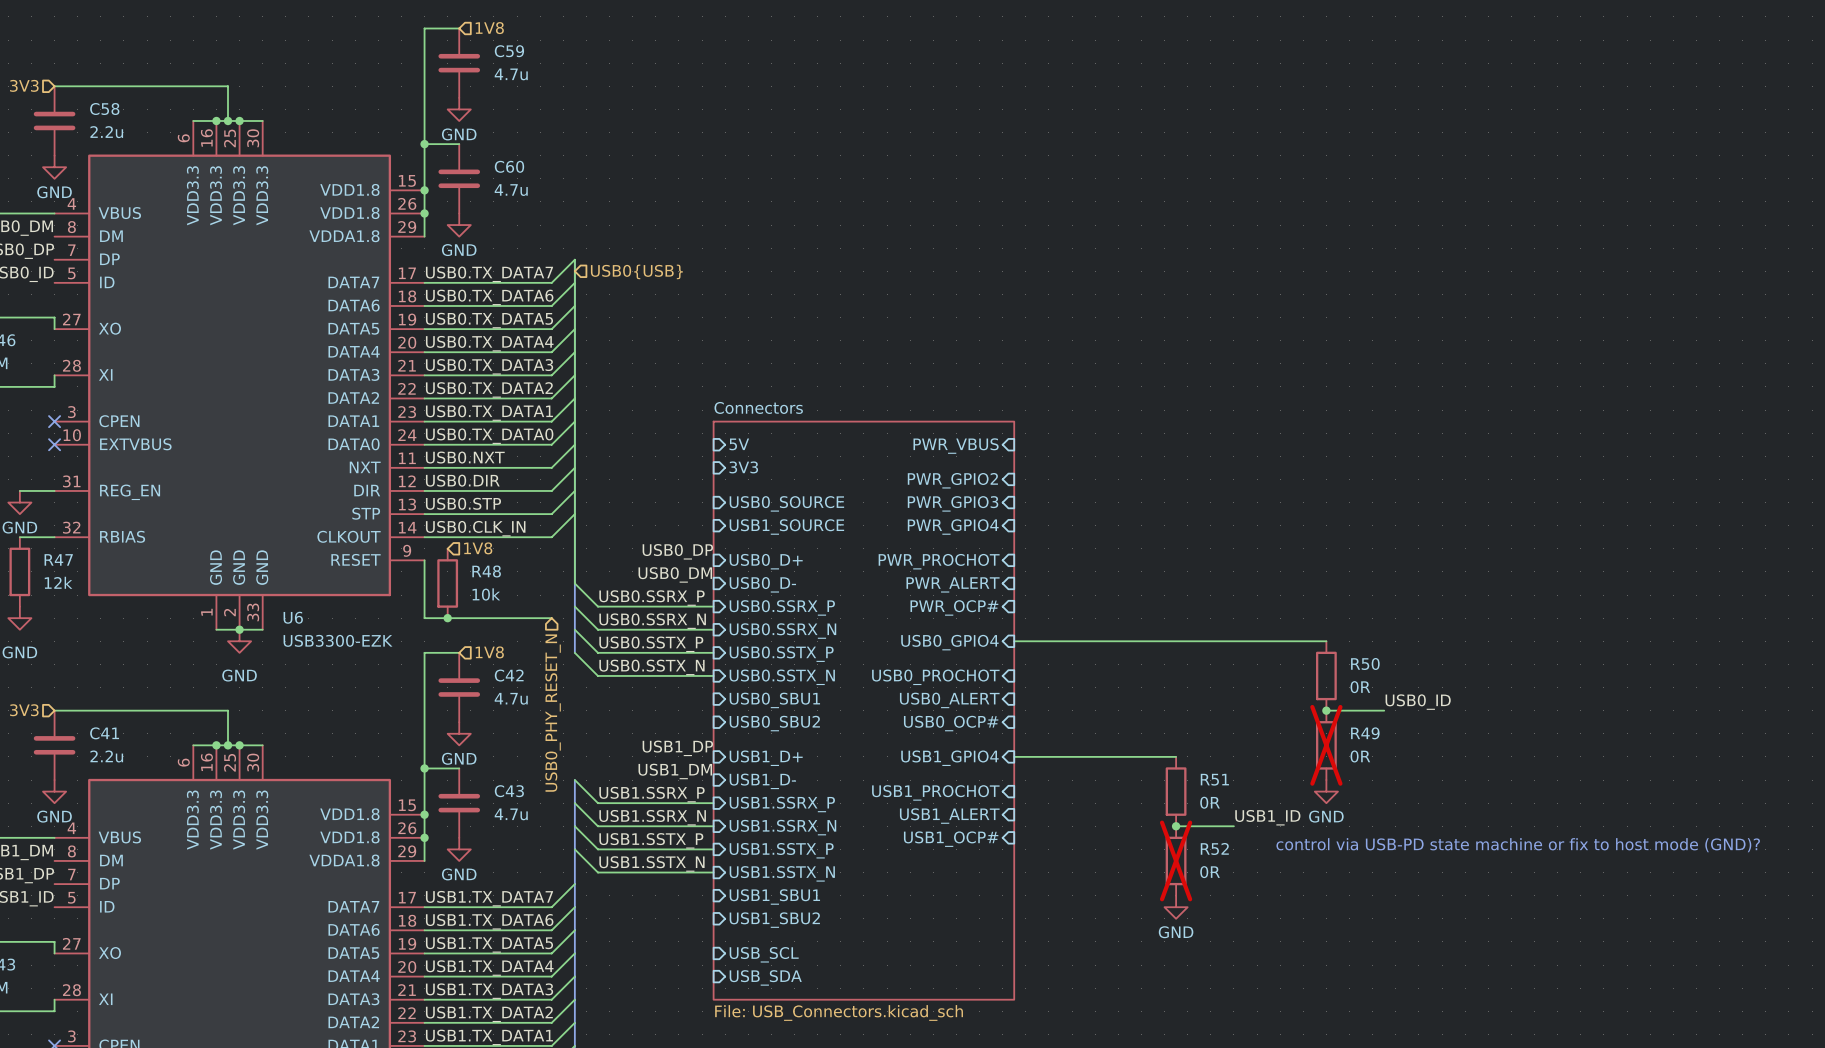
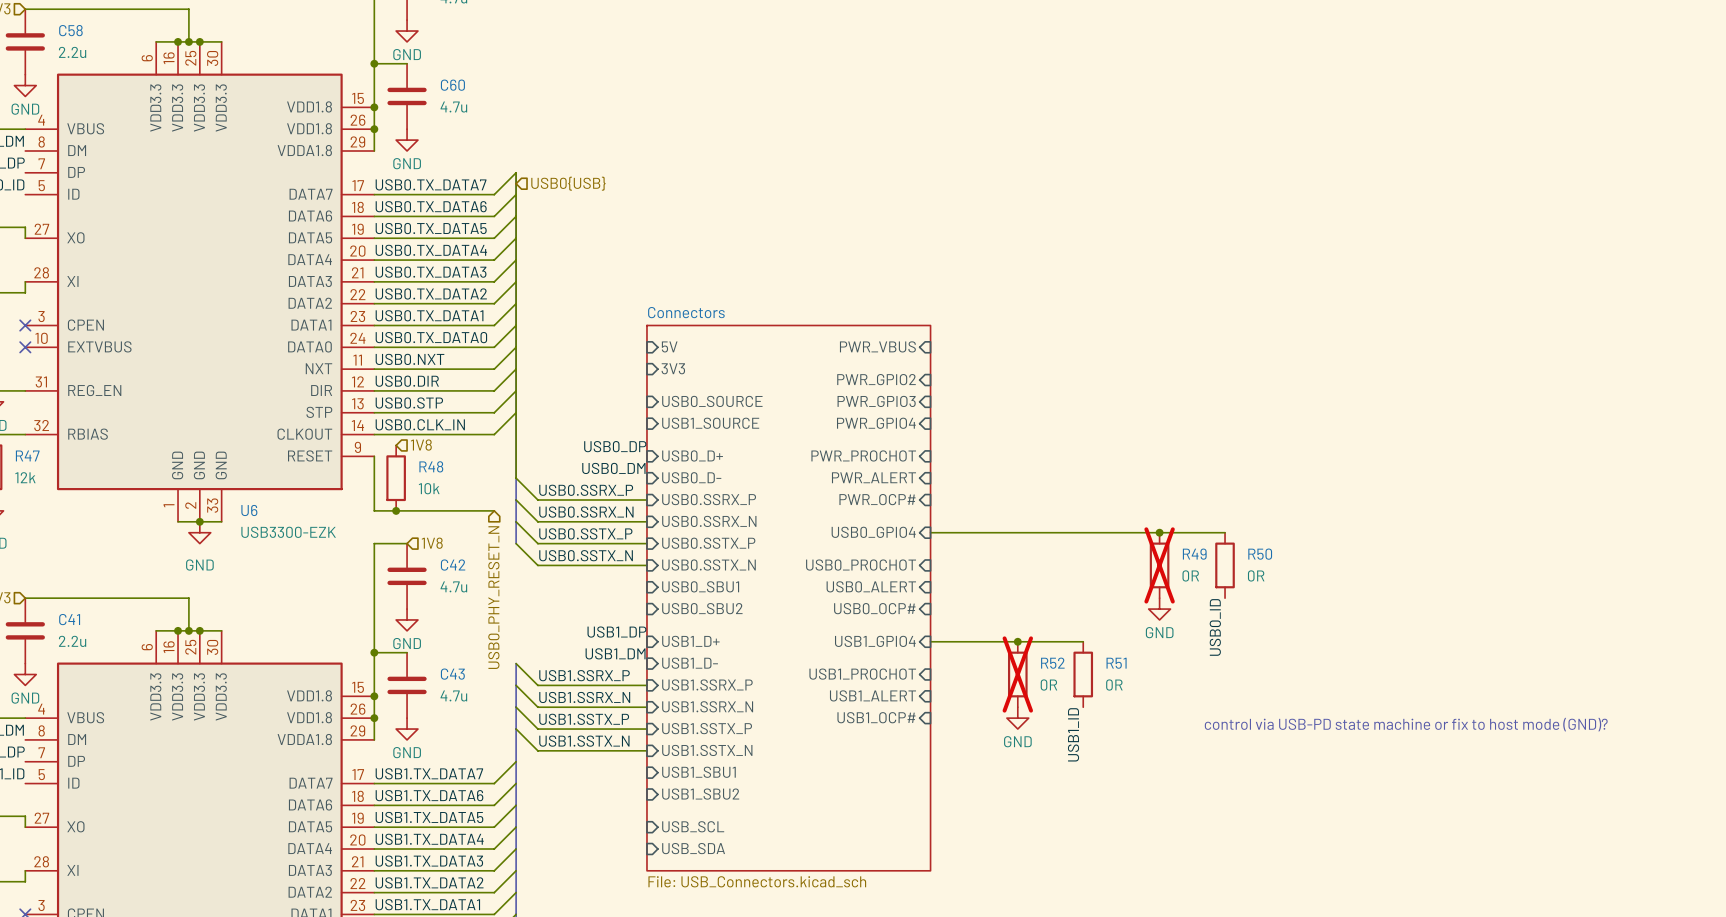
junction: none -> (1159, 532)
label rotation: 0° (1418, 702) -> 90° counterclockwise (1215, 627)
label position: USB0_ID (1418, 702) -> USB0_ID (1215, 627)
wire: (1326, 710) (1384, 710) -> none
junction: (1326, 710) -> none
R49 position: (1326, 745) -> (1159, 565)
junction: none -> (1017, 641)
power symbol position: GND (1326, 791) -> GND (1159, 609)
label rotation: 0° (1267, 817) -> 90° counterclockwise (1073, 734)
label position: USB1_ID (1267, 817) -> USB1_ID (1073, 734)
wire: (1176, 826) (1233, 826) -> none
junction: (1176, 826) -> none
R52 position: (1176, 860) -> (1017, 674)
power symbol position: GND (1176, 907) -> GND (1017, 718)

